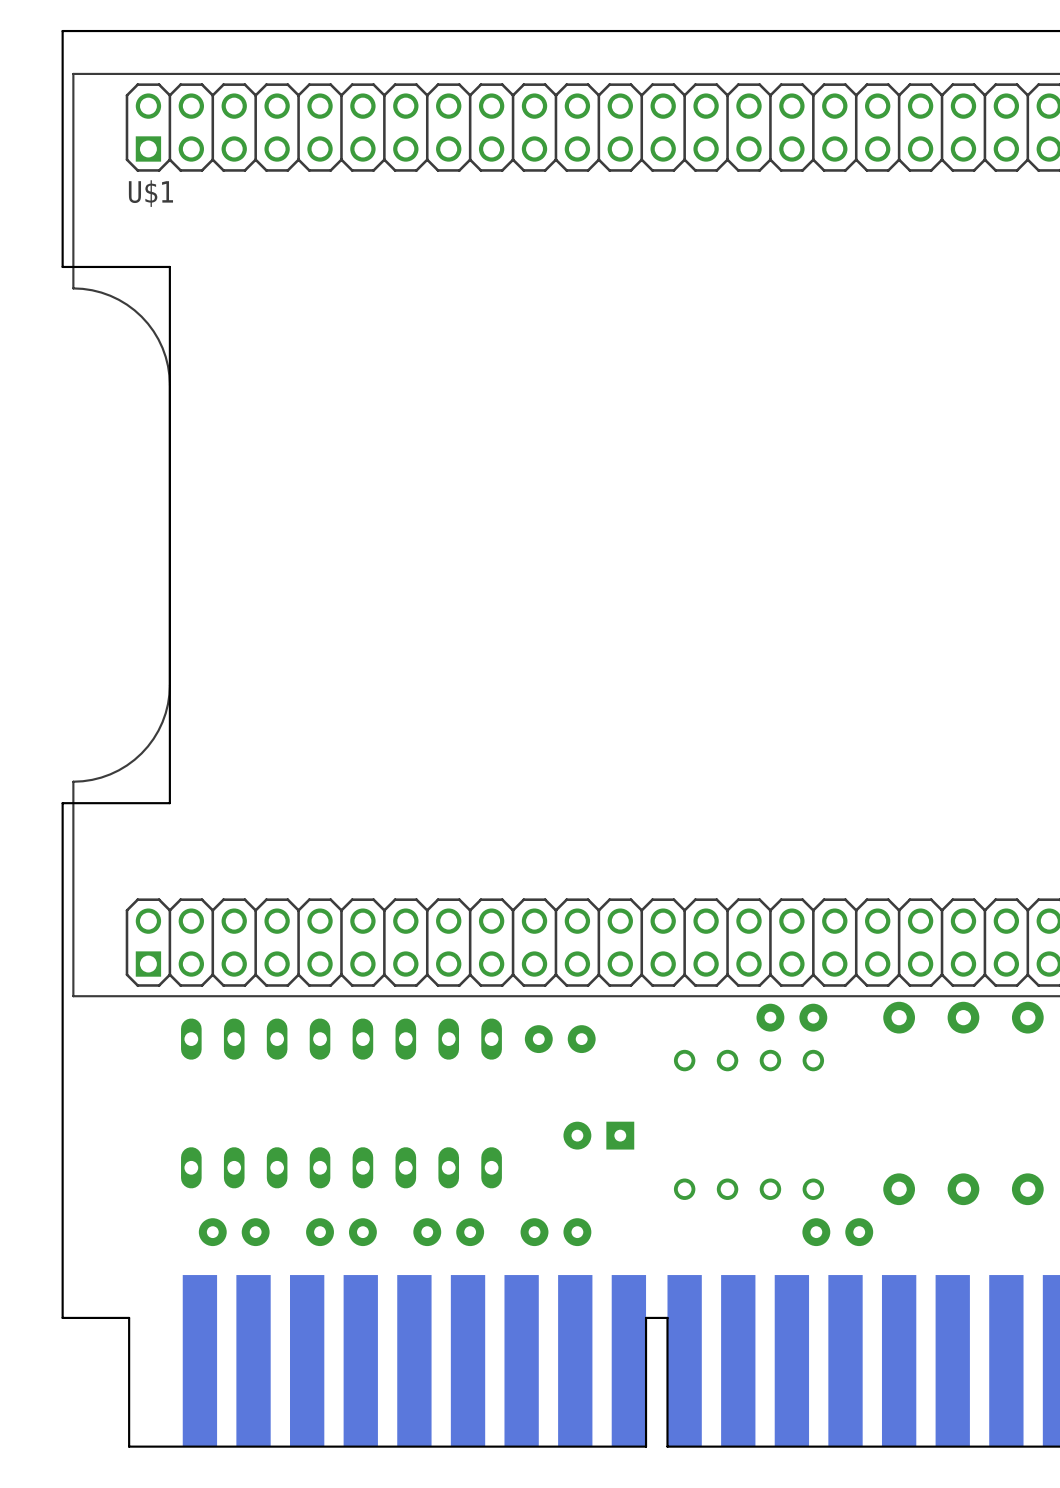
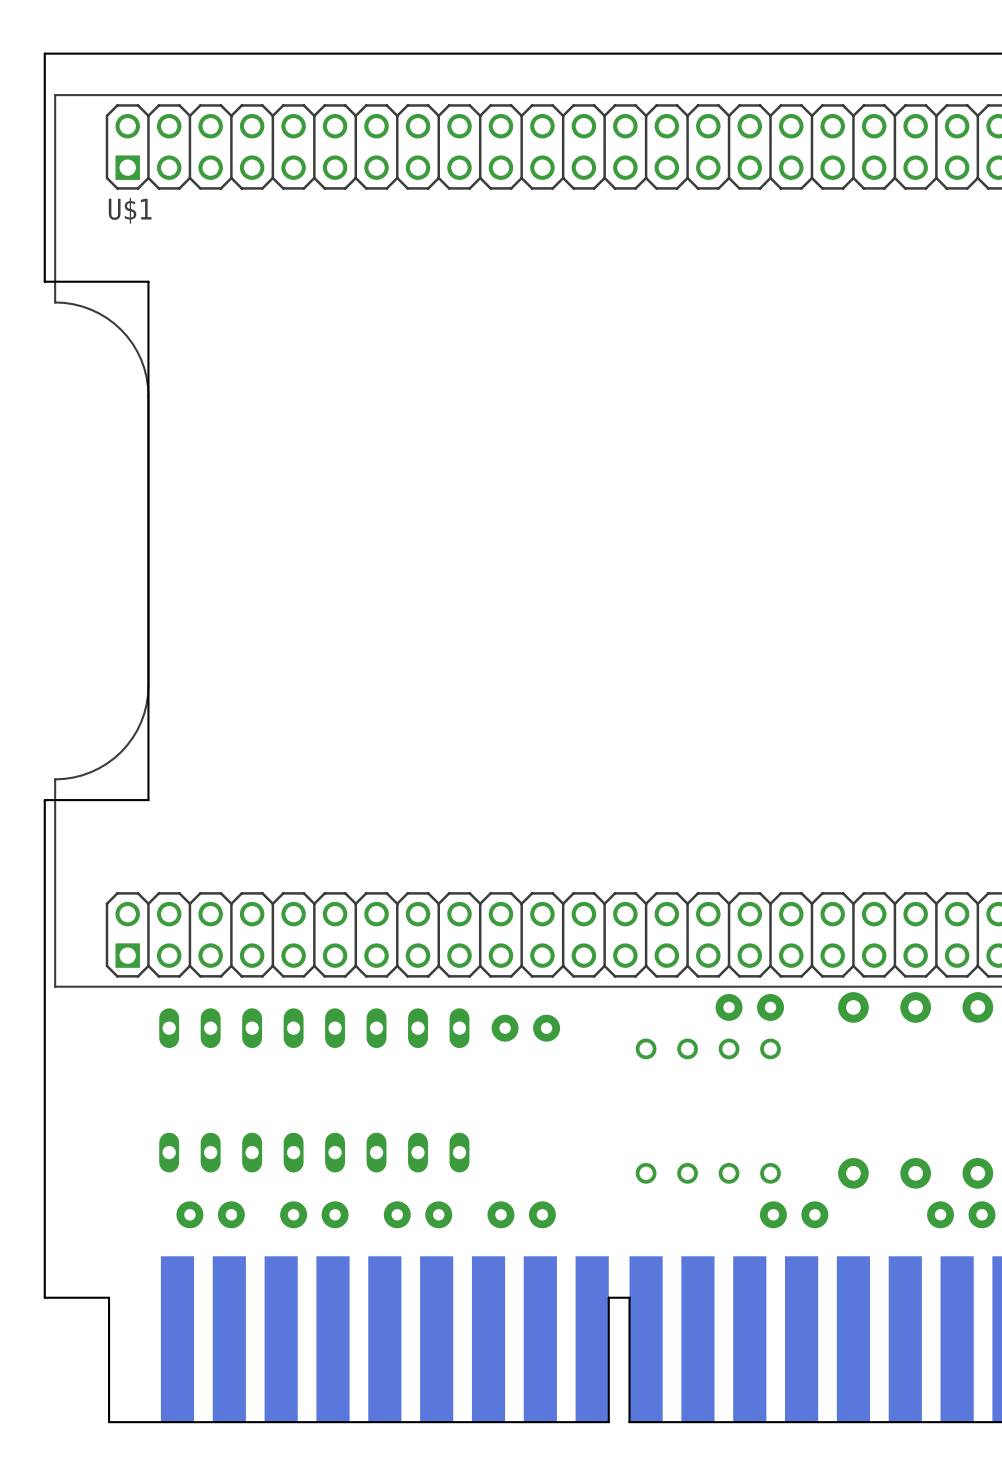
part: (598, 1135) -> none
part: none -> (961, 1214)

